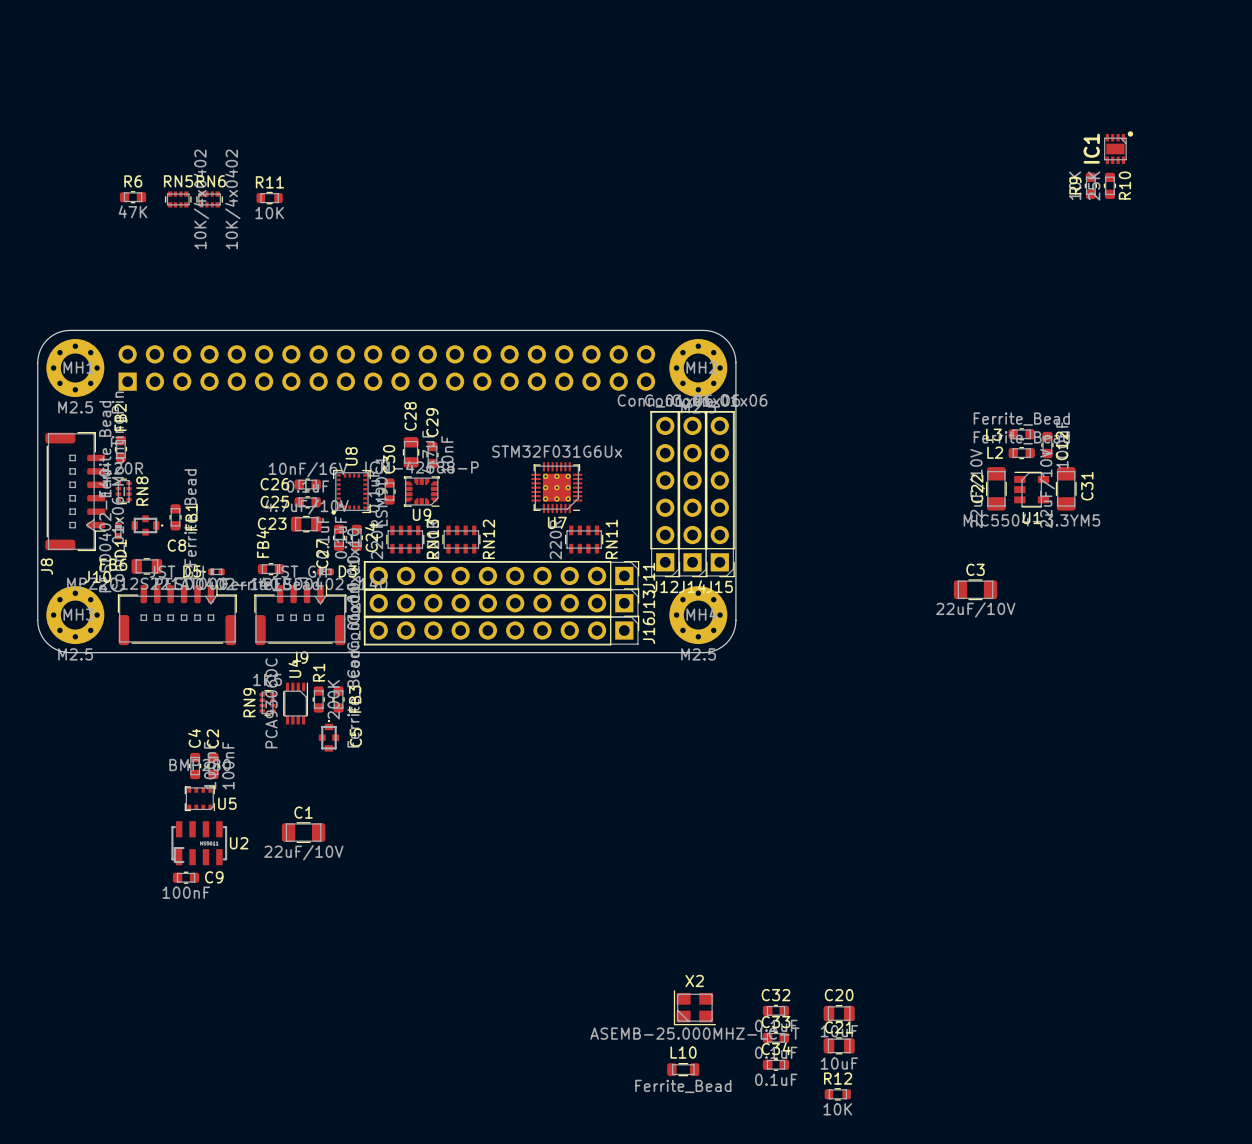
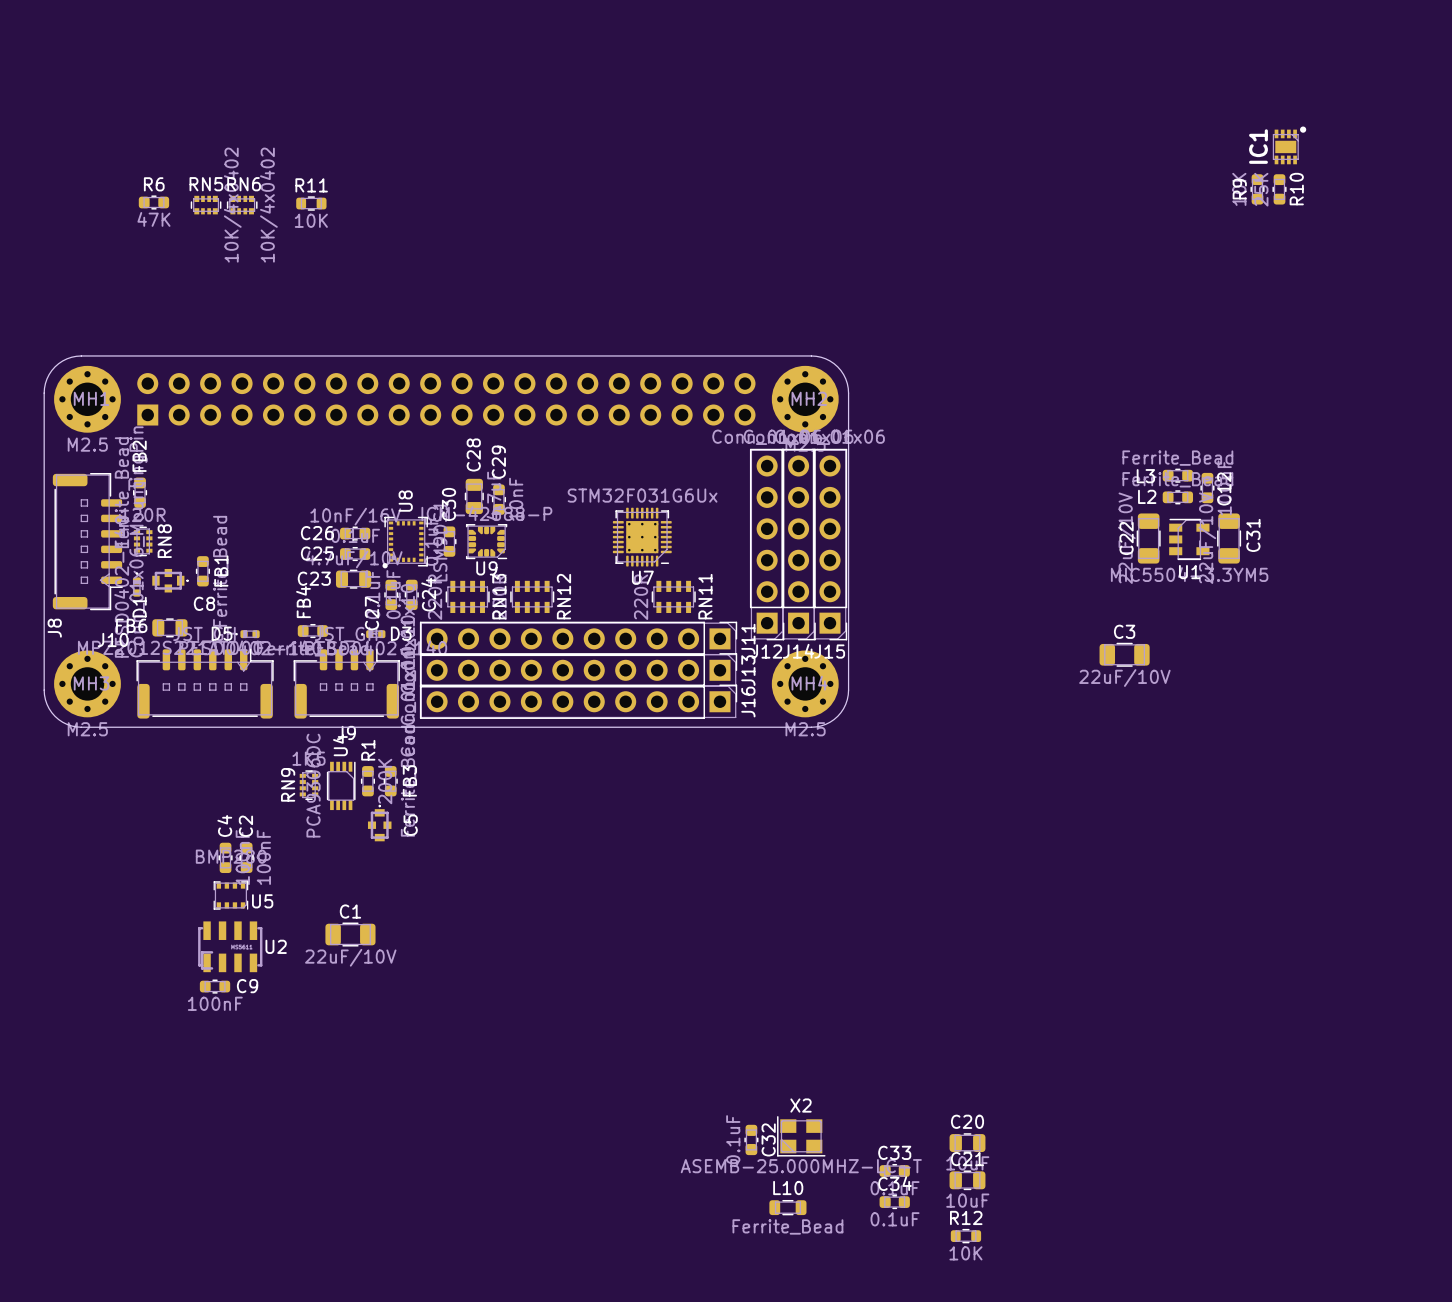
C32 rotation: 0° (775, 1010) -> 90° clockwise (751, 1139)
C32 position: (775, 1010) -> (751, 1139)

